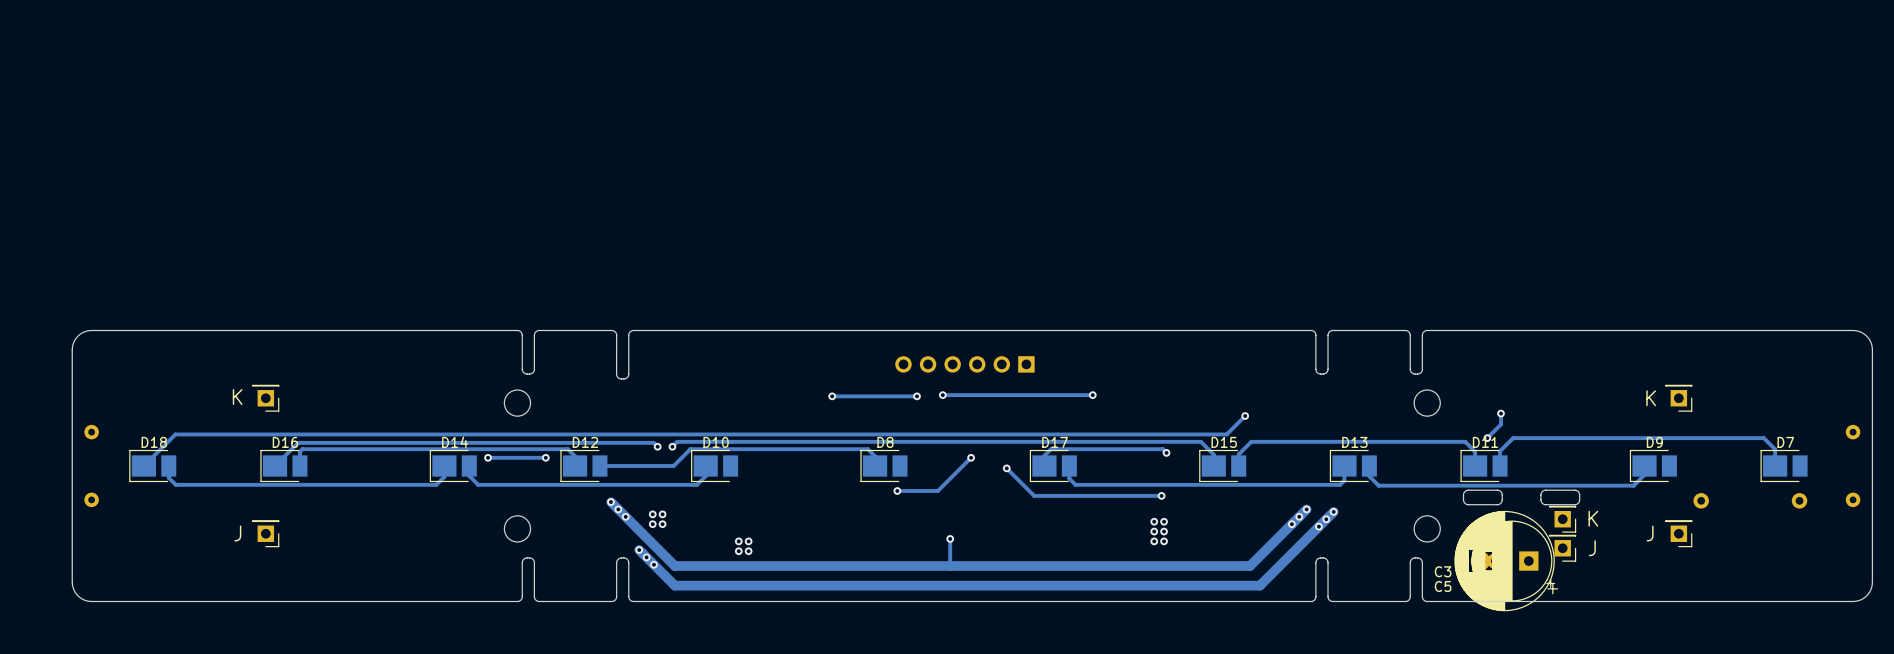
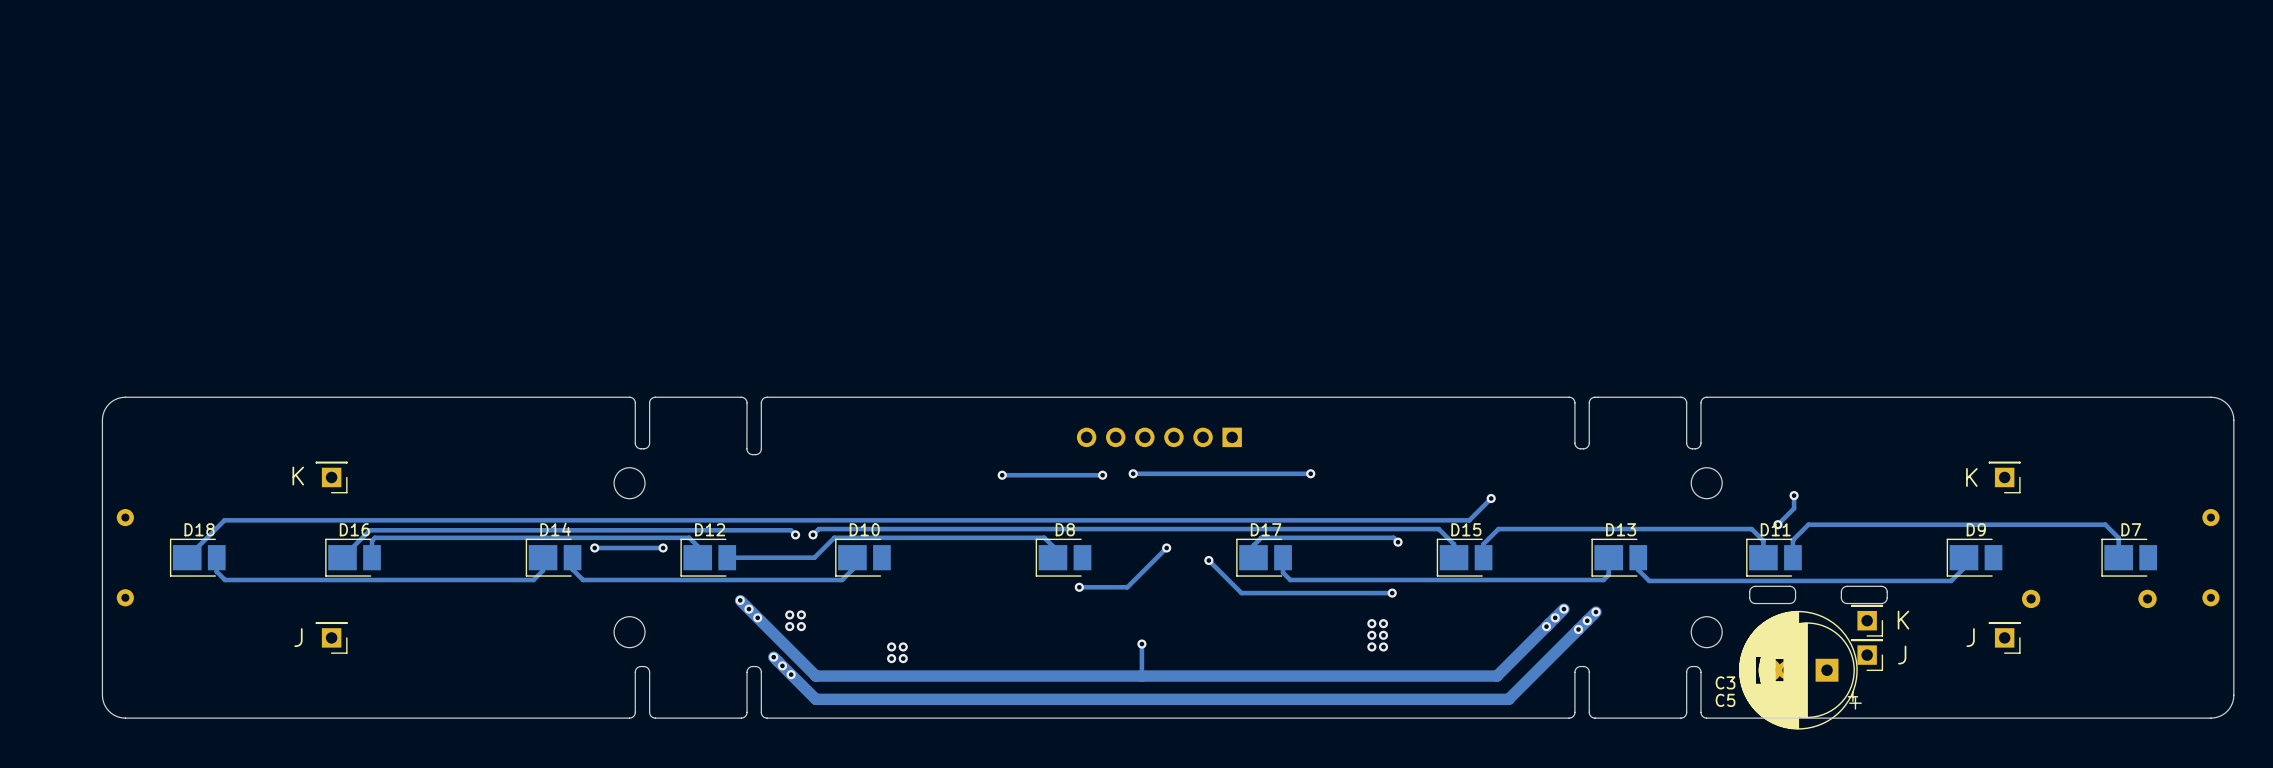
via: none -> (1371, 623)
via: (1164, 521) -> none
via: none -> (1371, 635)
via: (1164, 531) -> none
via: none -> (1371, 646)
via: (1164, 541) -> none

